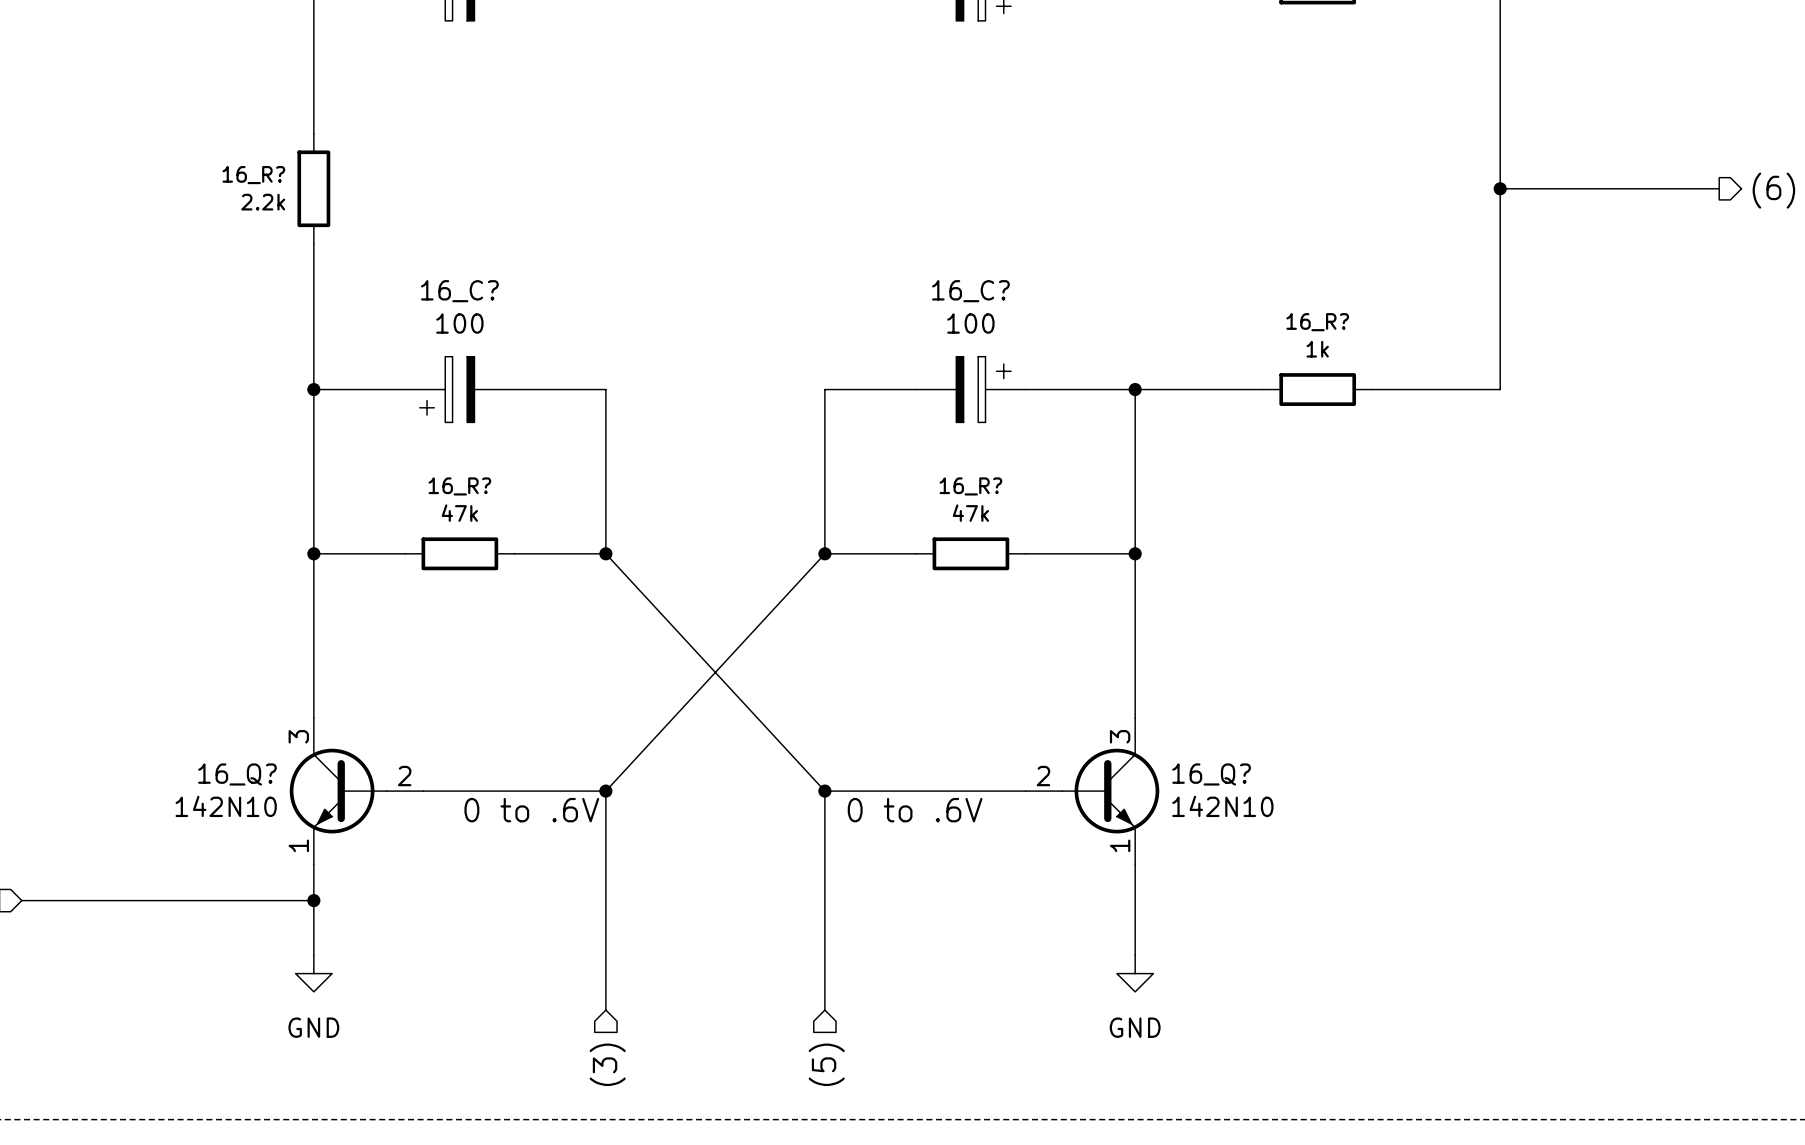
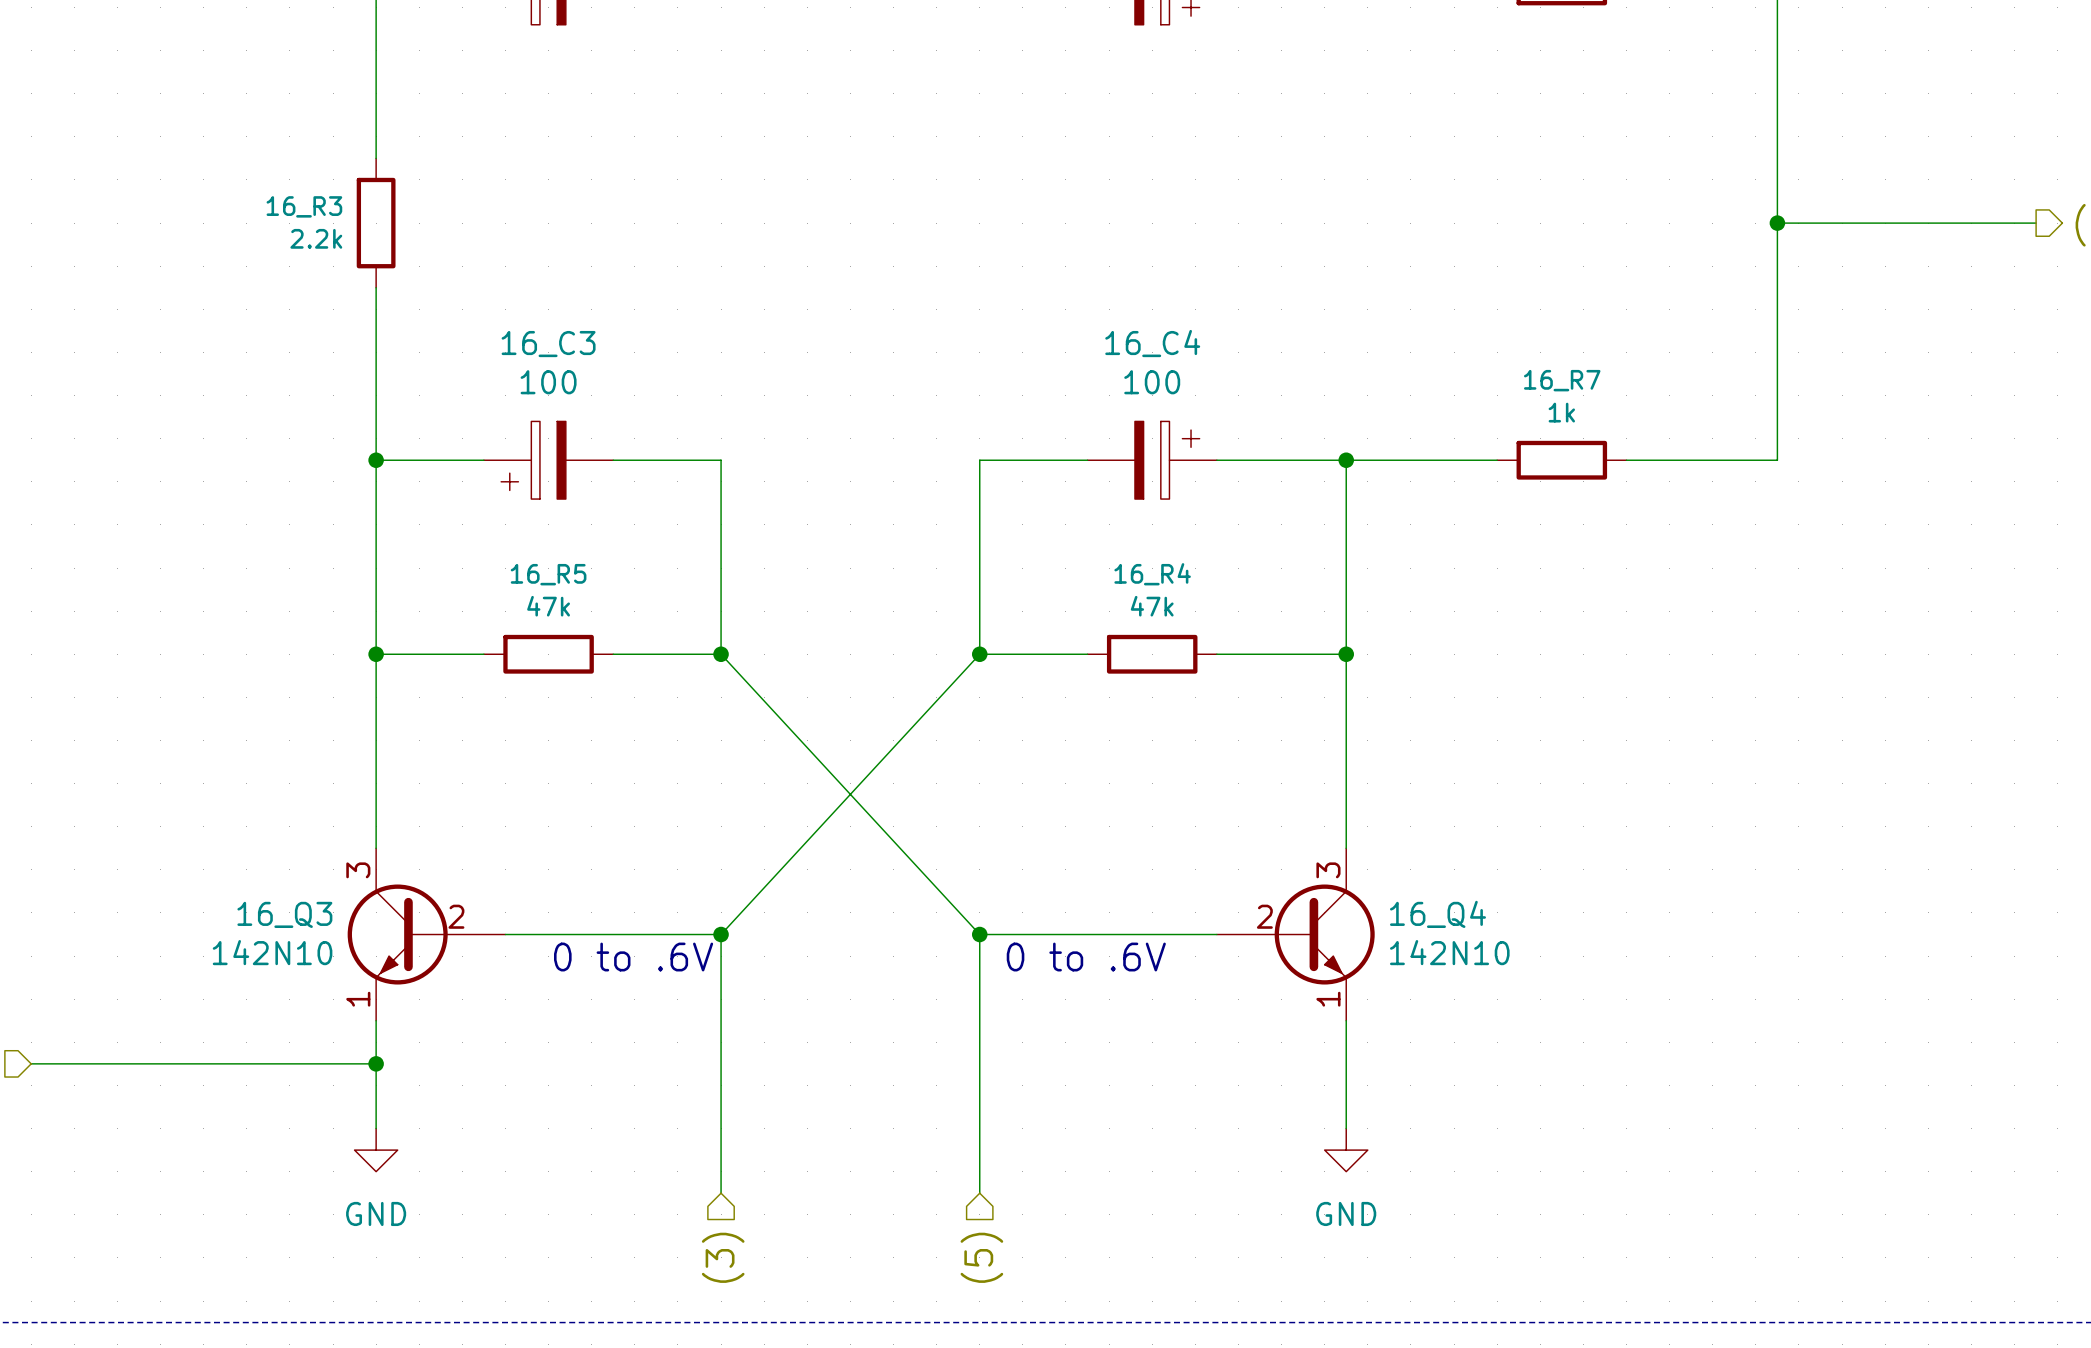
16_R? name: 16_R? (253, 175) -> 16_R3 (304, 206)
16_C? name: 16_C? (459, 291) -> 16_C3 (548, 344)
16_C? name: 16_C? (970, 291) -> 16_C4 (1152, 343)
16_R? name: 16_R? (1317, 322) -> 16_R7 (1562, 380)
16_R? name: 16_R? (459, 486) -> 16_R5 (548, 574)
16_R? name: 16_R? (970, 486) -> 16_R4 (1152, 574)
16_Q?: 142N10 (356, 791) -> none
16_Q3: none -> 142N10 (426, 934)
16_Q?: 142N10 (1092, 791) -> none
16_Q4: none -> 142N10 (1295, 934)

